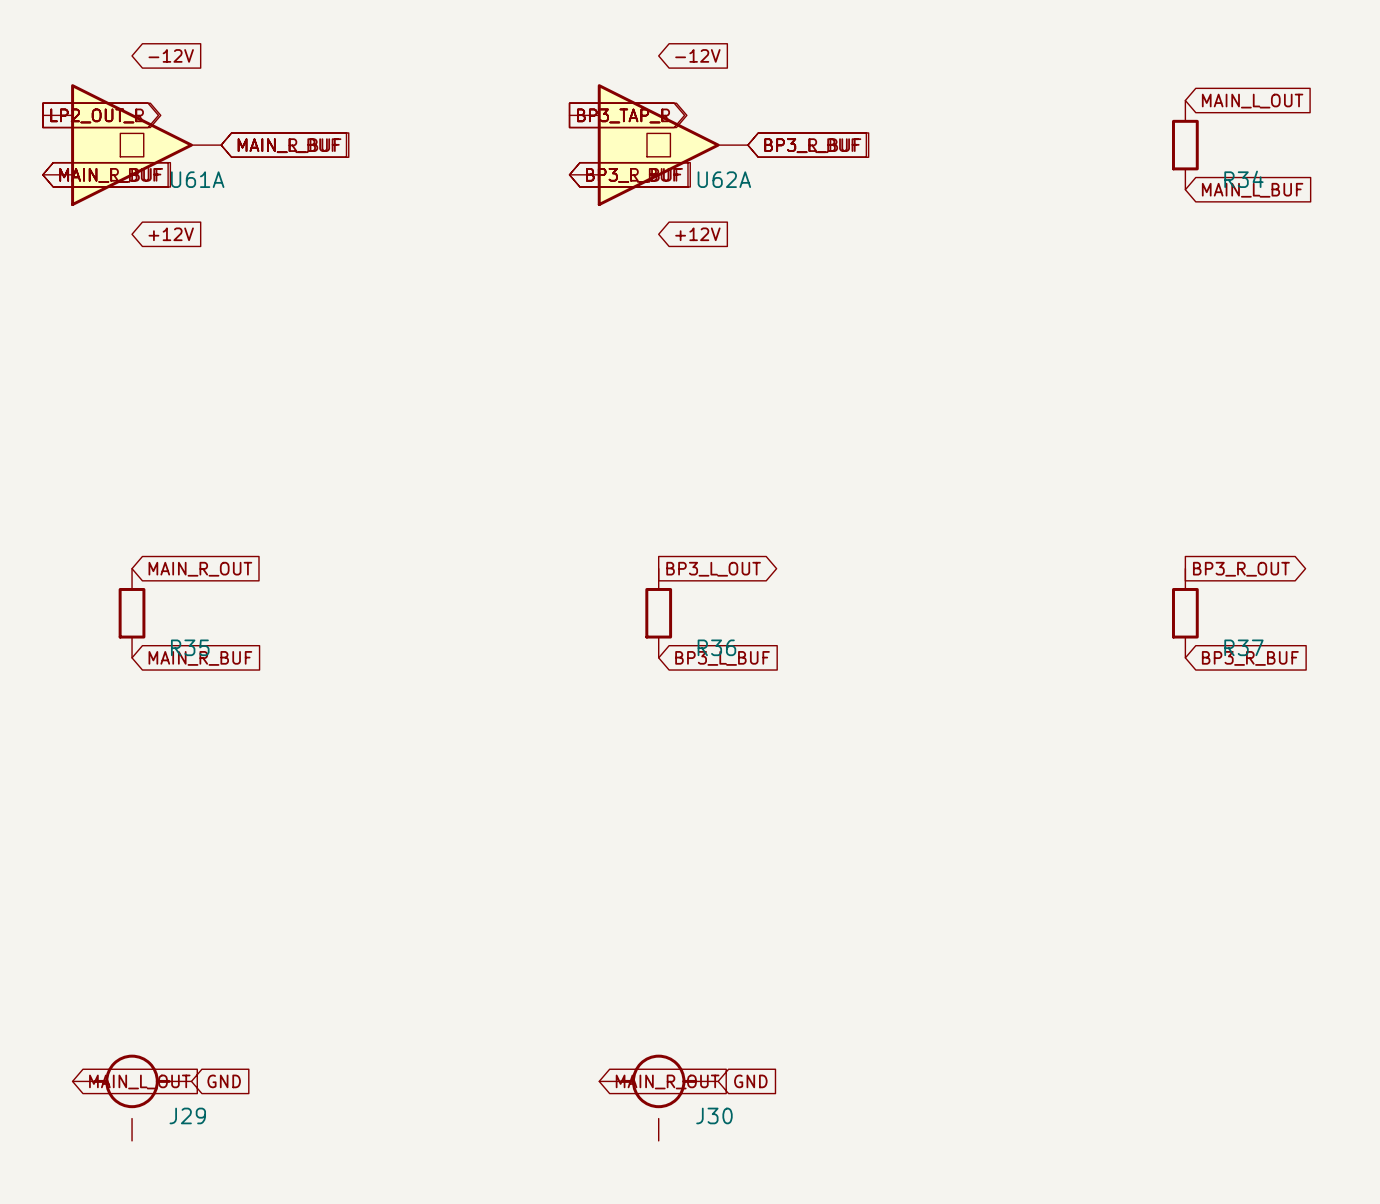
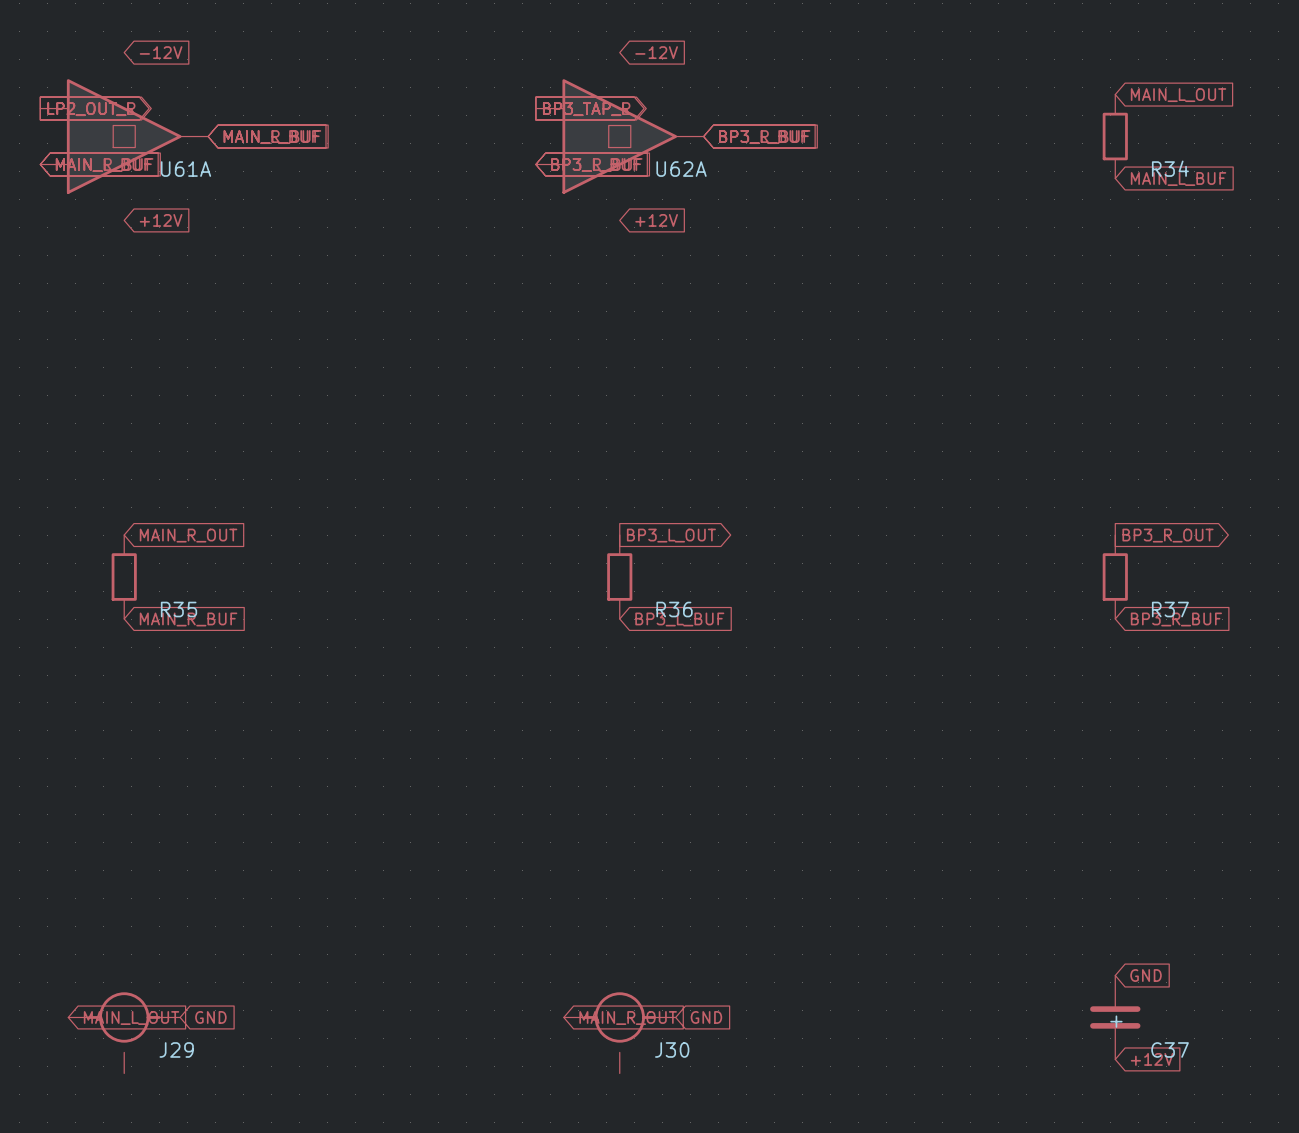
global label: none -> GND (1146, 975)
C37: none -> (1115, 1017)
global label: none -> +12V (1152, 1059)

